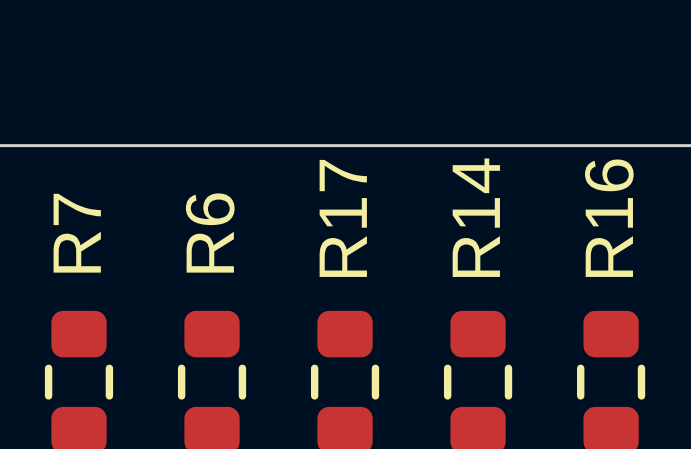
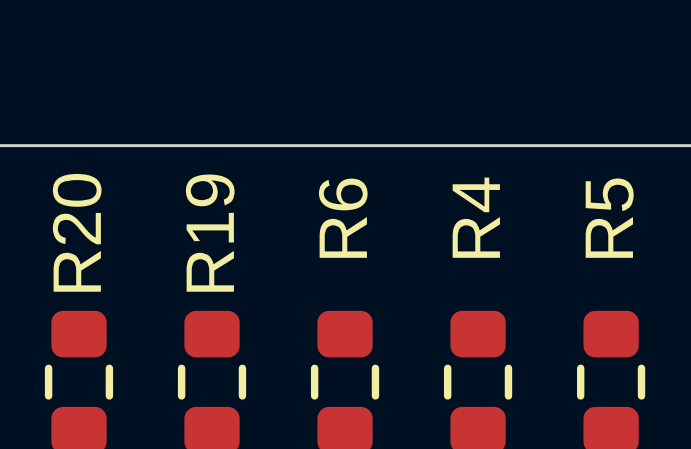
R14 name: R14 (476, 217) -> R4 (476, 217)
R17 name: R17 (343, 218) -> R6 (343, 218)
R16 name: R16 (609, 218) -> R5 (609, 218)
R7 name: R7 (77, 233) -> R20 (77, 232)
R6 name: R6 (210, 233) -> R19 (210, 233)

